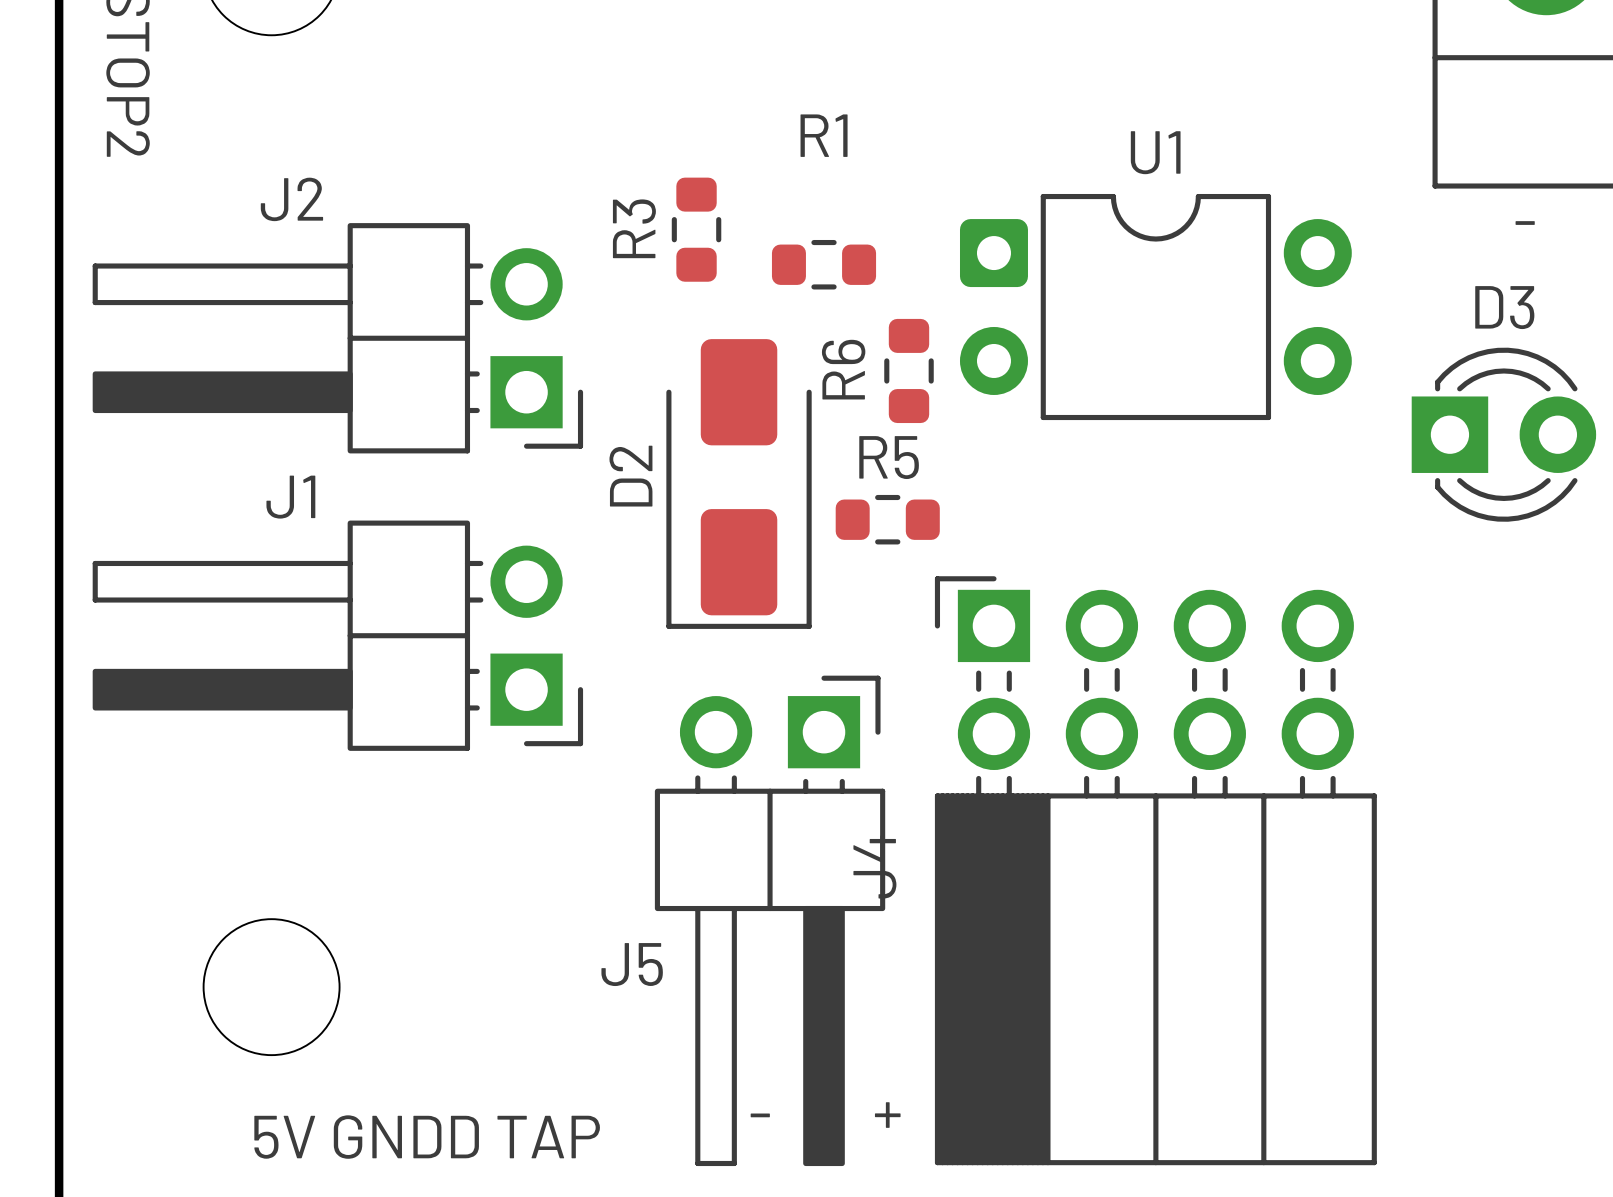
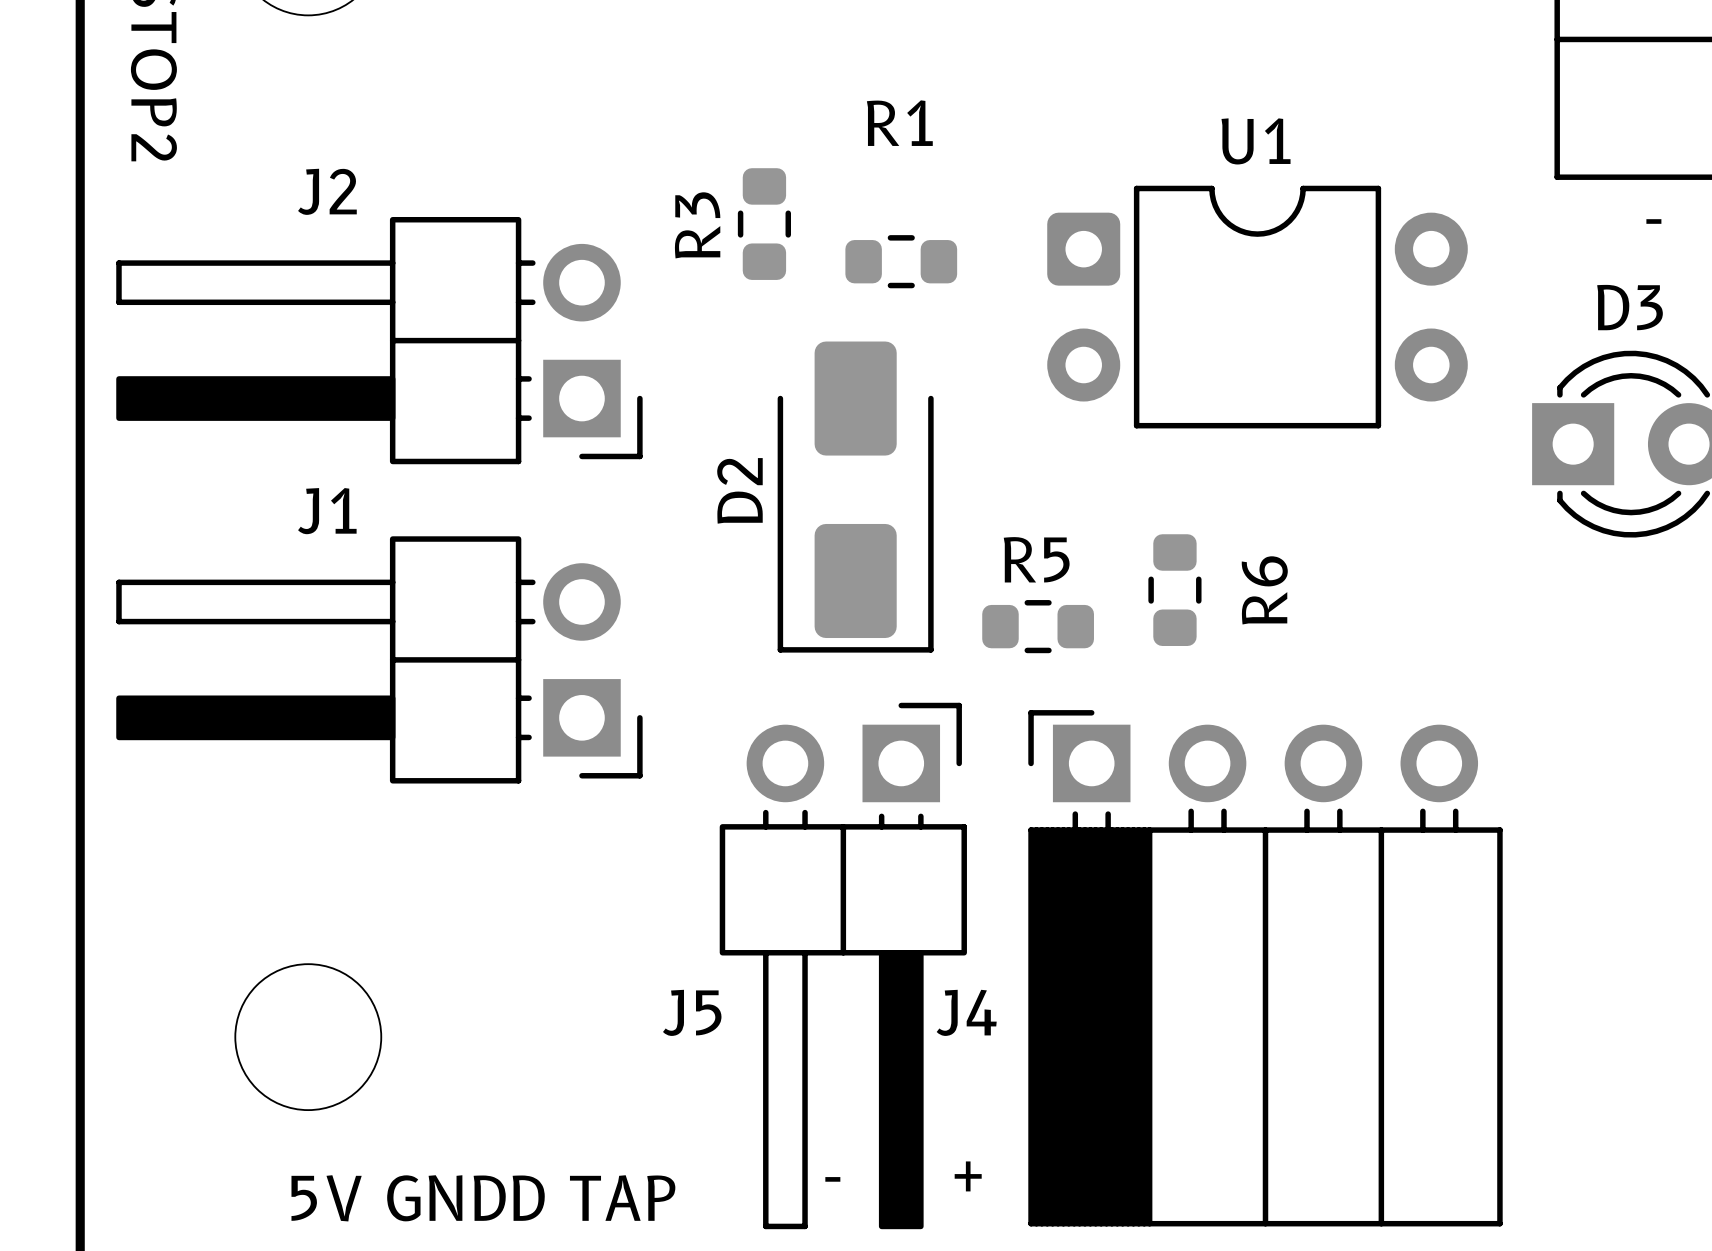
R6 name position: R6 (843, 369) -> R6 (1264, 590)
R6 position: (909, 370) -> (1174, 590)
D2 position: (739, 484) -> (855, 497)
R5 position: (887, 519) -> (1038, 626)
J4 footprint: [934, 576, 1377, 1166] -> [1028, 710, 1503, 1227]

